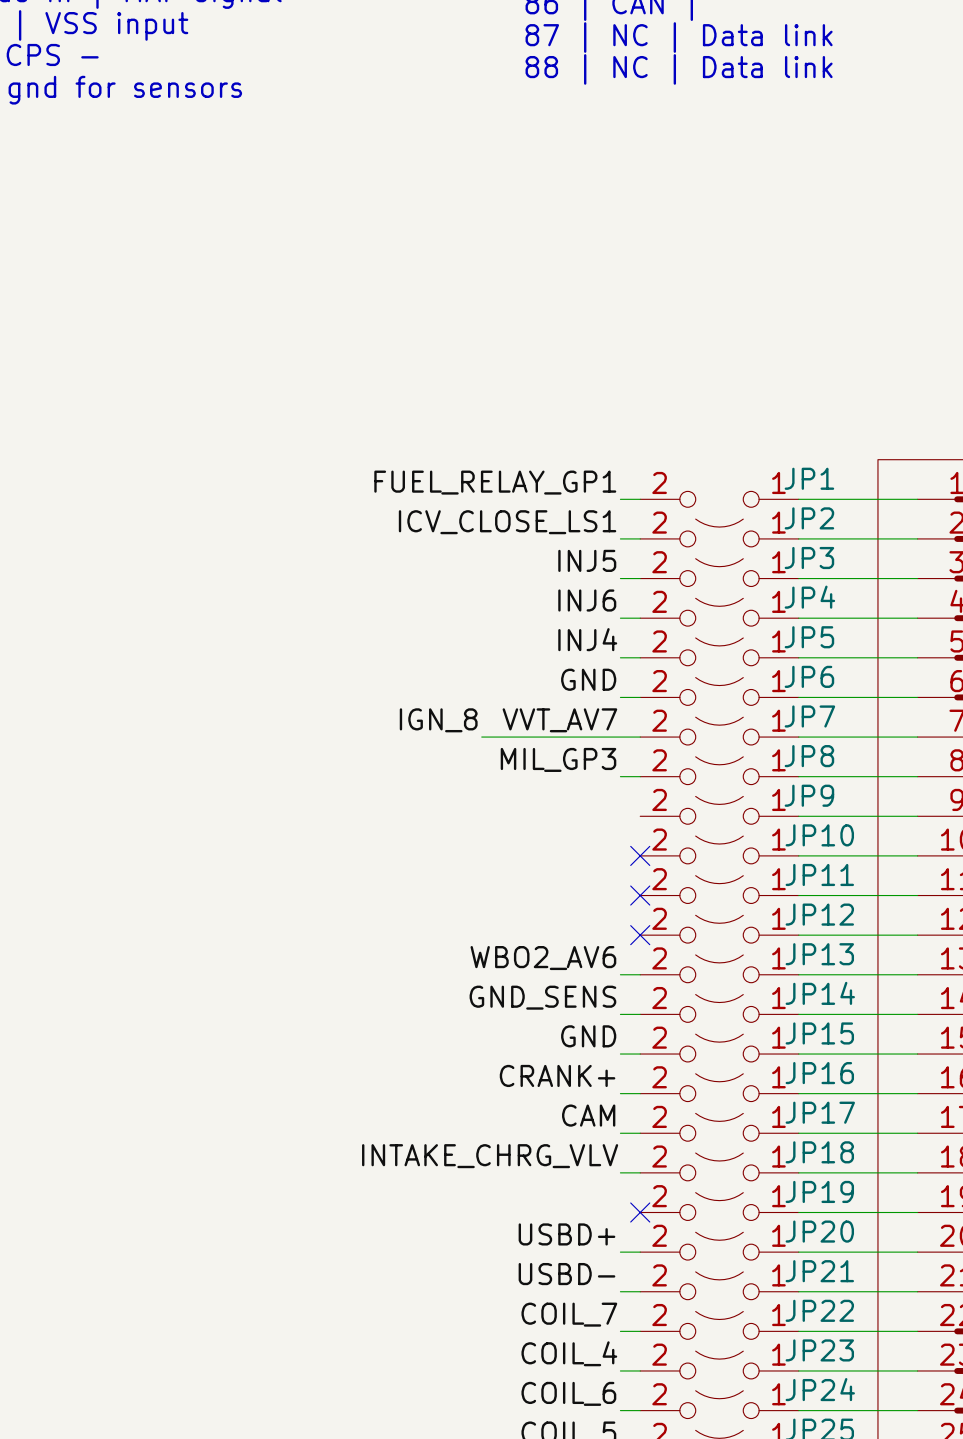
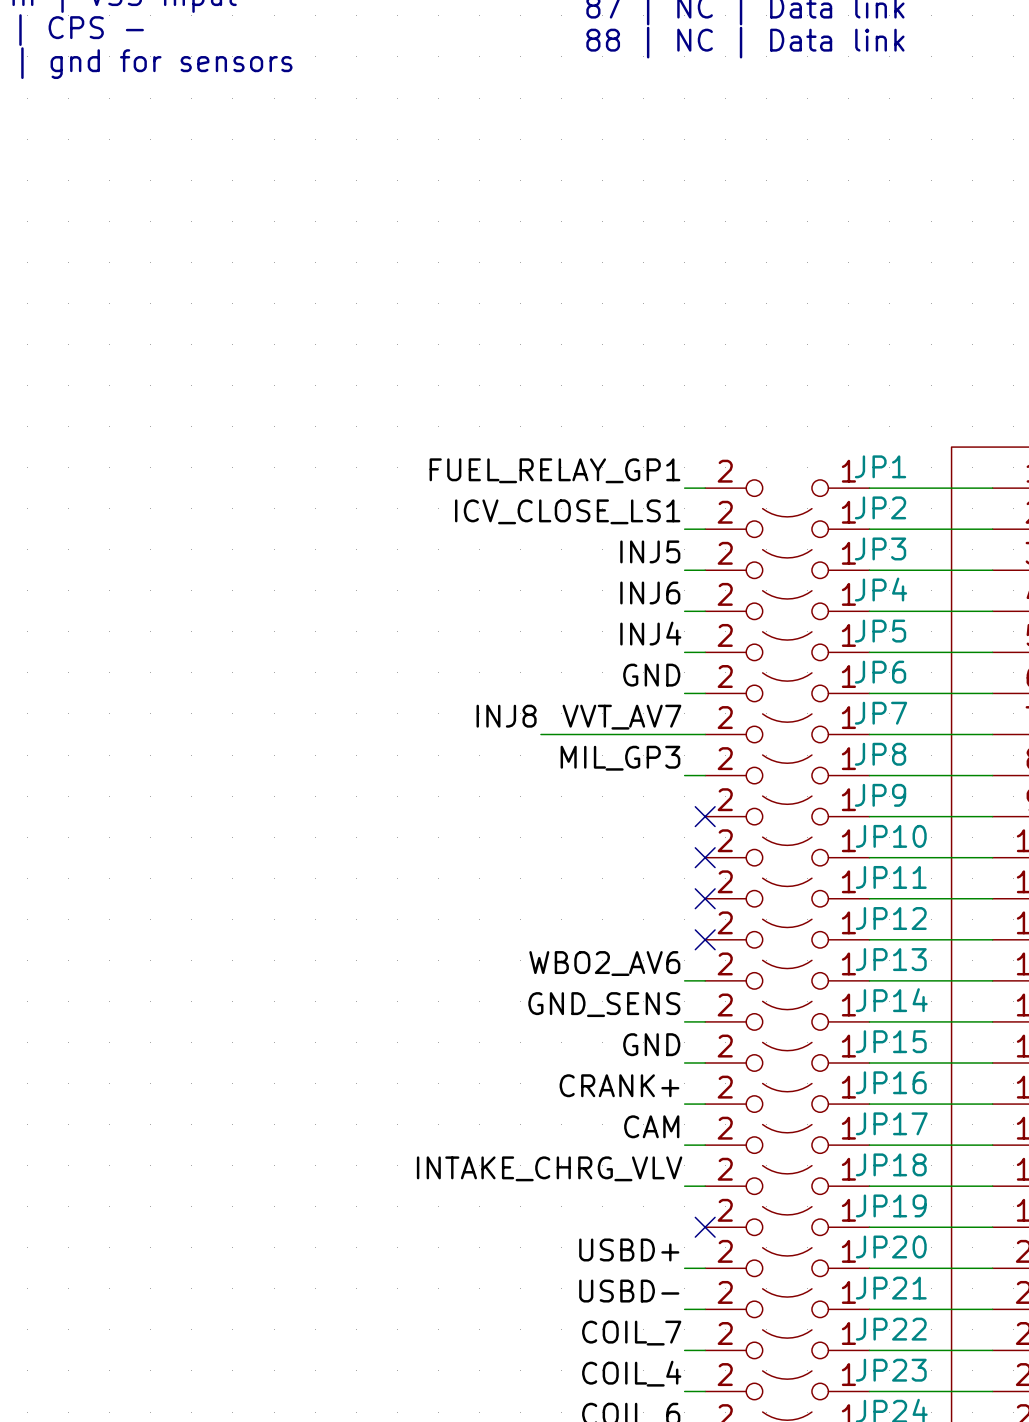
label: IGN_8 (438, 720) -> INJ8 (506, 716)
no-connect mark: none -> (705, 816)

